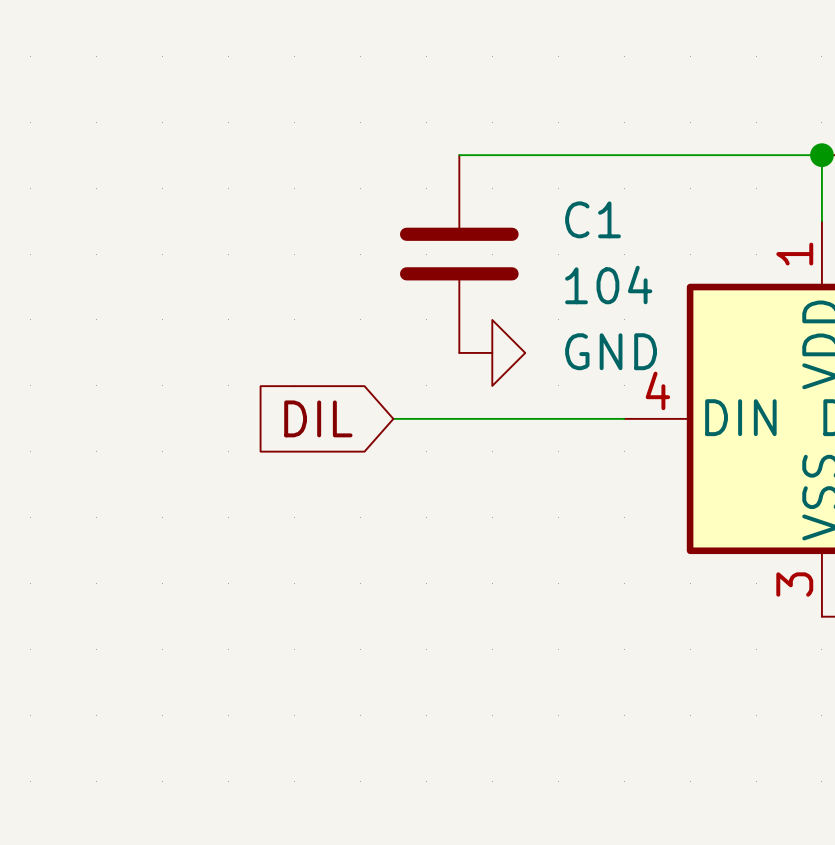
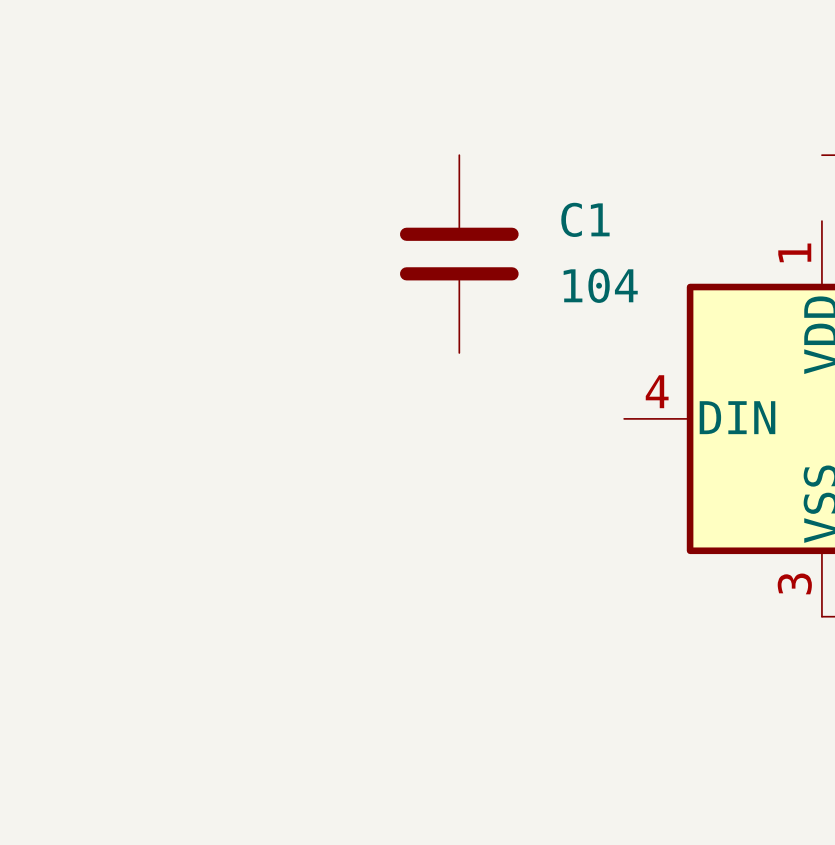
wire: (459, 155) (821, 155) (821, 221) -> none
junction: (821, 155) -> none
power symbol: GND (492, 352) -> none
global label: DIL (318, 418) -> none
wire: (393, 418) (624, 418) -> none

